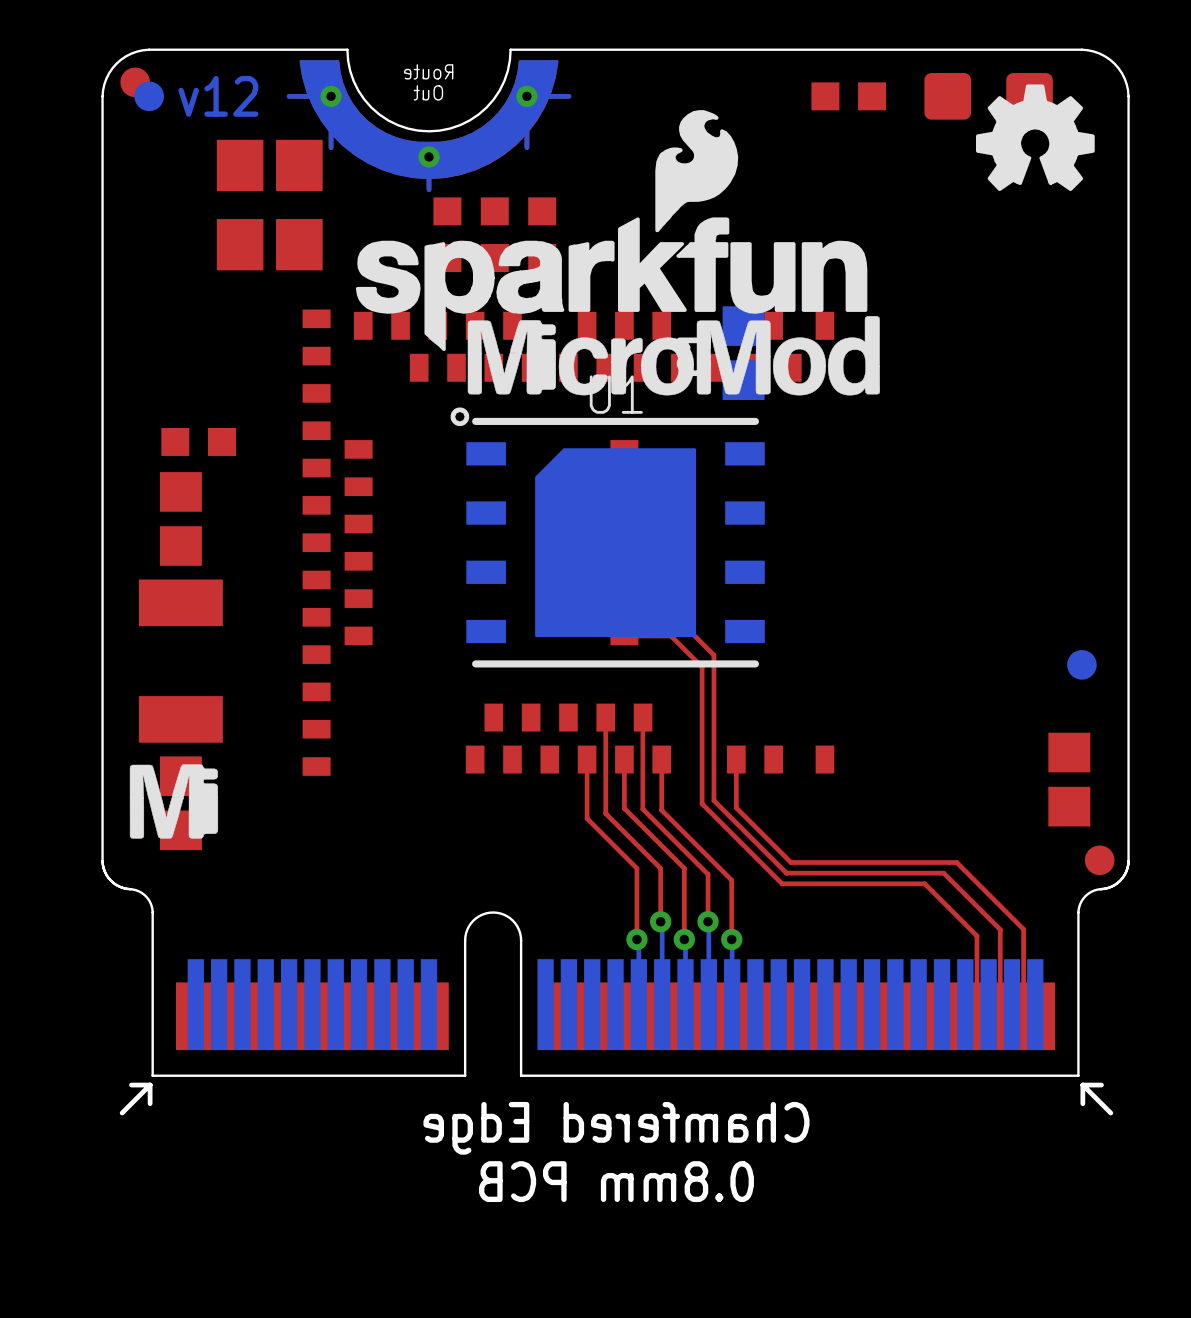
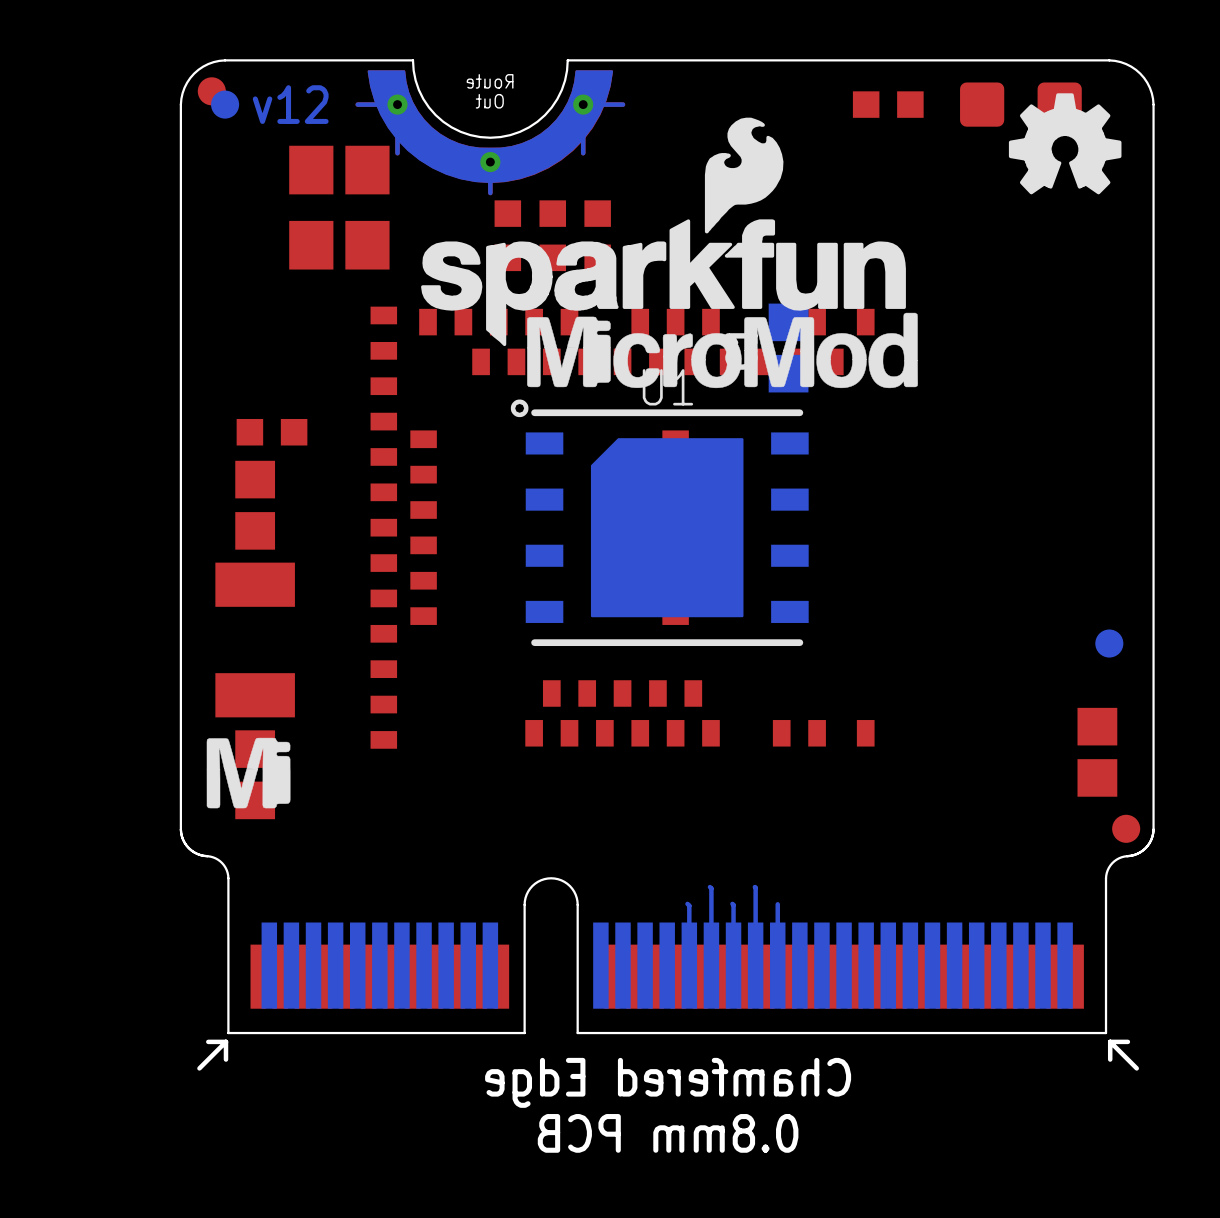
top track: (624, 598) (657, 598) (713, 655) (713, 800) (786, 873) (943, 873) (1000, 929) (1000, 1016) -> none
top track: (624, 635) (671, 635) (702, 667) (702, 803) (782, 883) (924, 883) (976, 936) (976, 1016) -> none
top track: (605, 717) (605, 813) (660, 868) (660, 921) -> none
top track: (642, 717) (642, 809) (708, 874) (708, 921) -> none
top track: (587, 759) (587, 818) (636, 868) (636, 939) -> none
top track: (624, 759) (624, 808) (684, 868) (684, 939) -> none
top track: (661, 759) (661, 810) (731, 880) (731, 939) -> none
top track: (736, 759) (736, 807) (790, 862) (956, 862) (1023, 929) (1023, 1016) -> none
via: (660, 921) -> none
via: (708, 921) -> none
via: (636, 939) -> none
via: (684, 939) -> none
via: (731, 939) -> none

